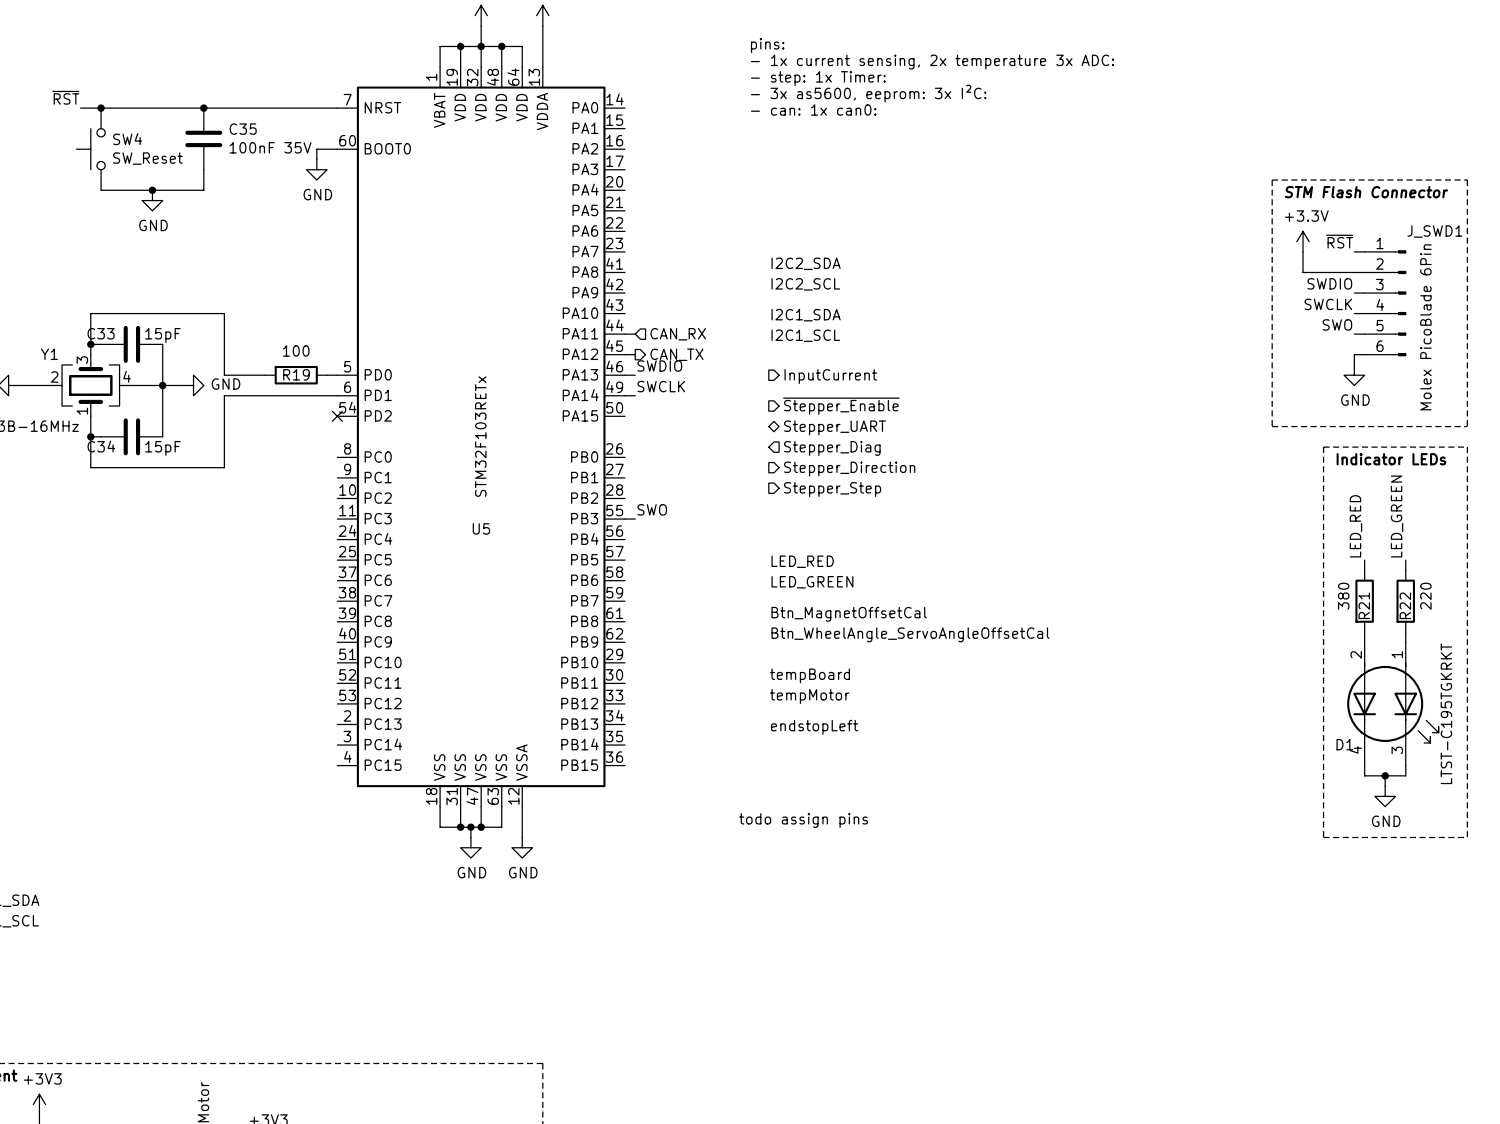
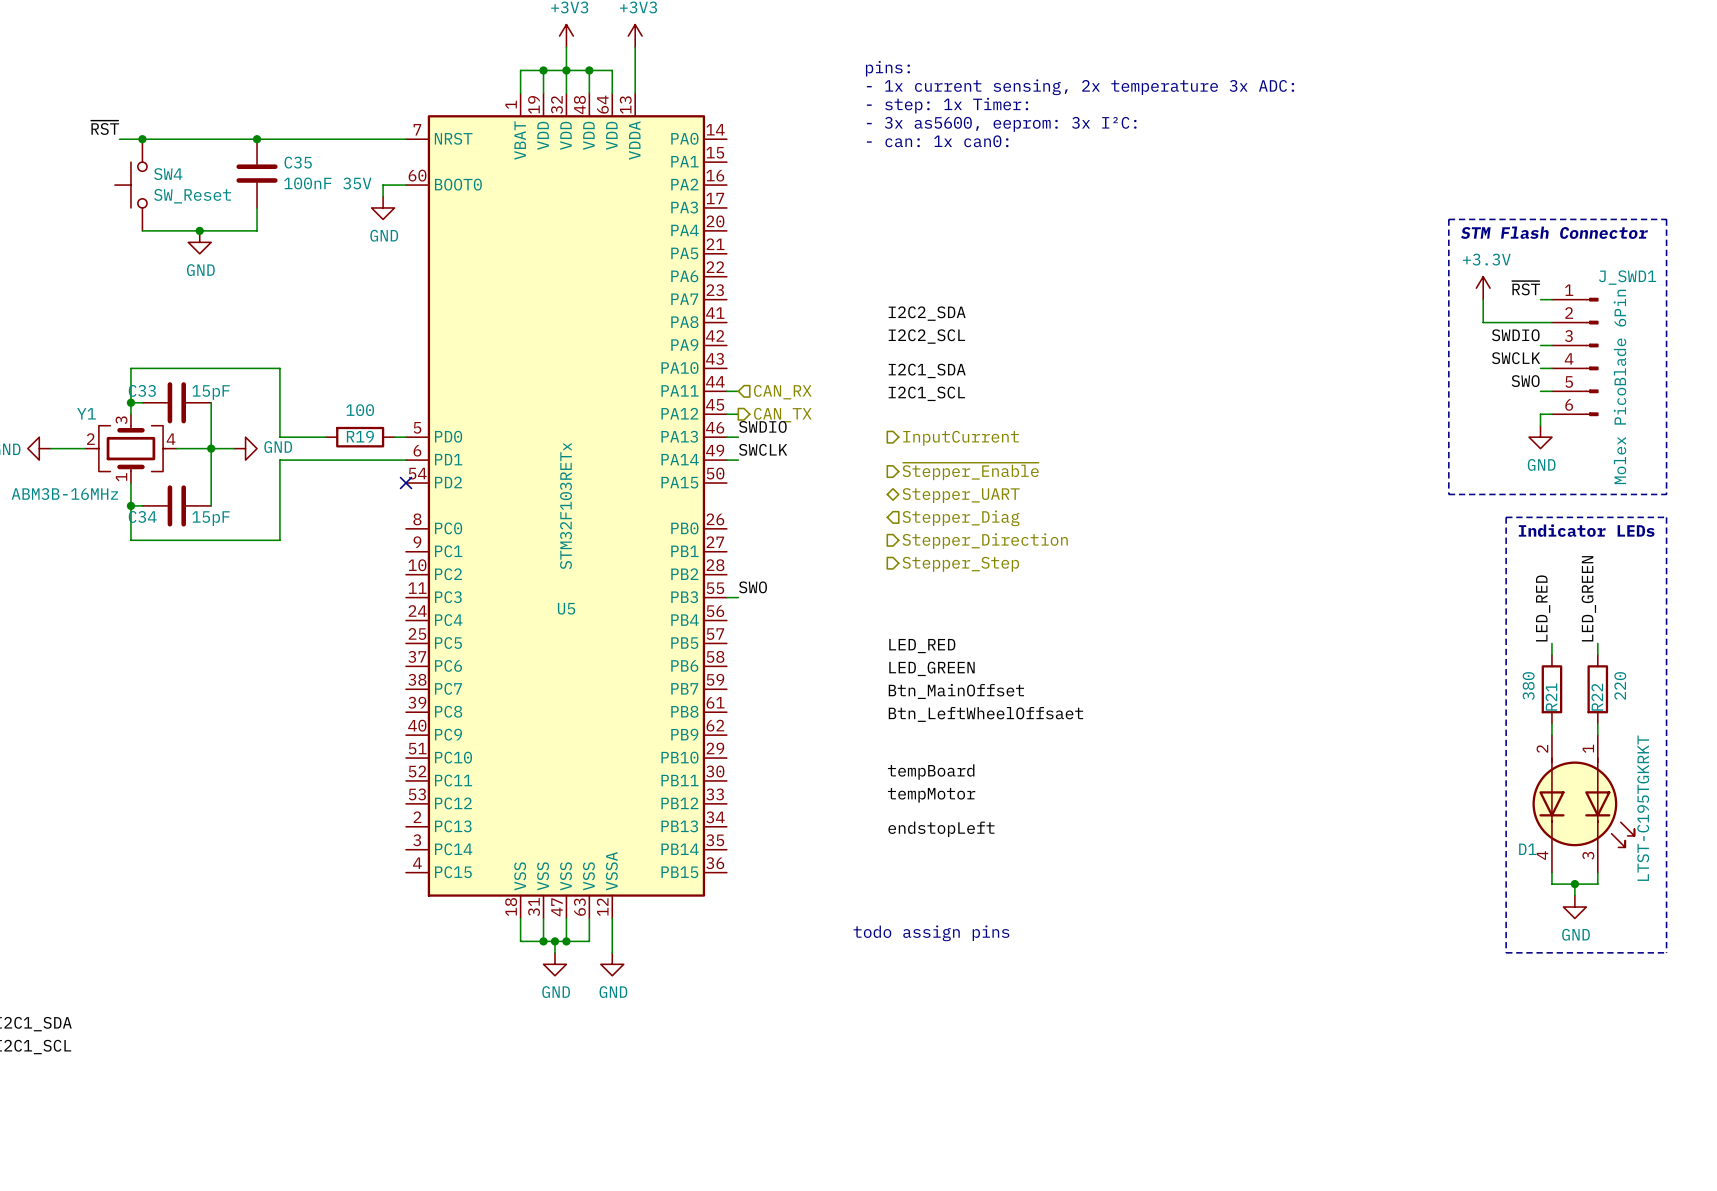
label: none -> Btn_MainOffset (956, 691)
label: Btn_MagnetOffsetCal (849, 614) -> none
label: none -> Btn_LeftWheelOffsaet (985, 714)
label: Btn_WheelAngle_ServoAngleOffsetCal (910, 634) -> none

